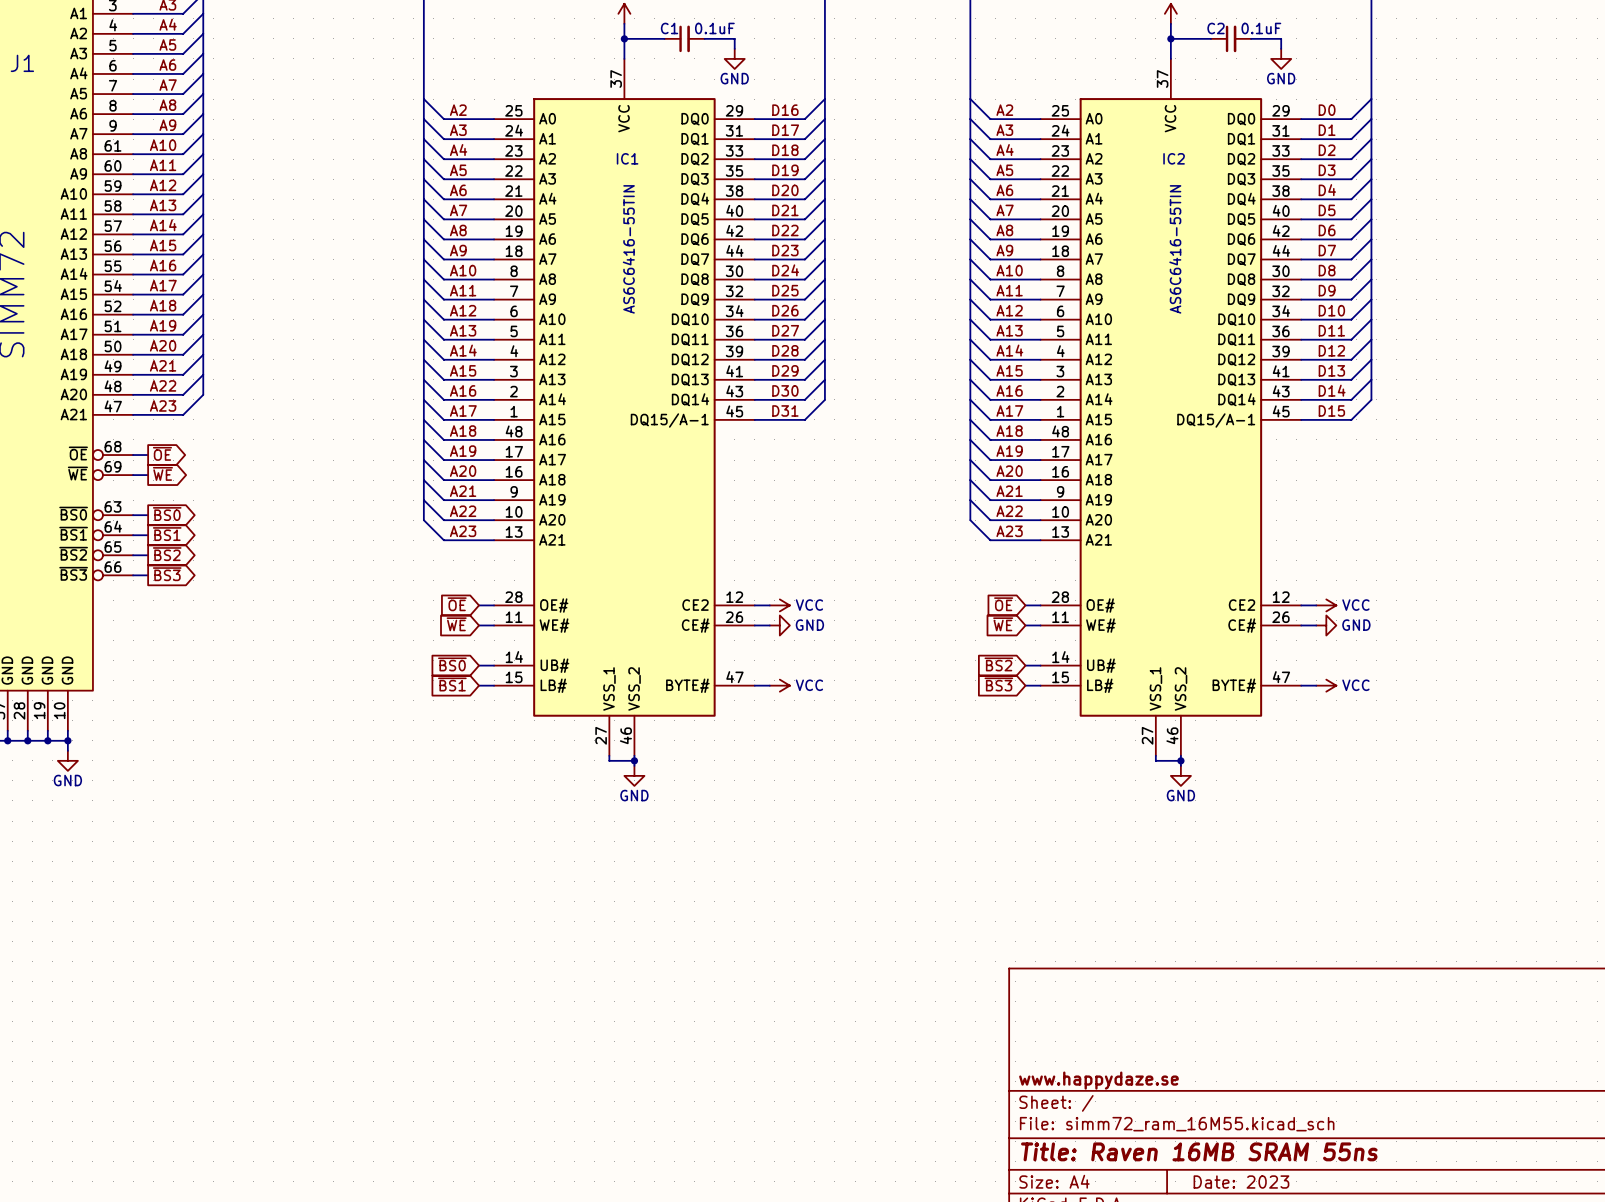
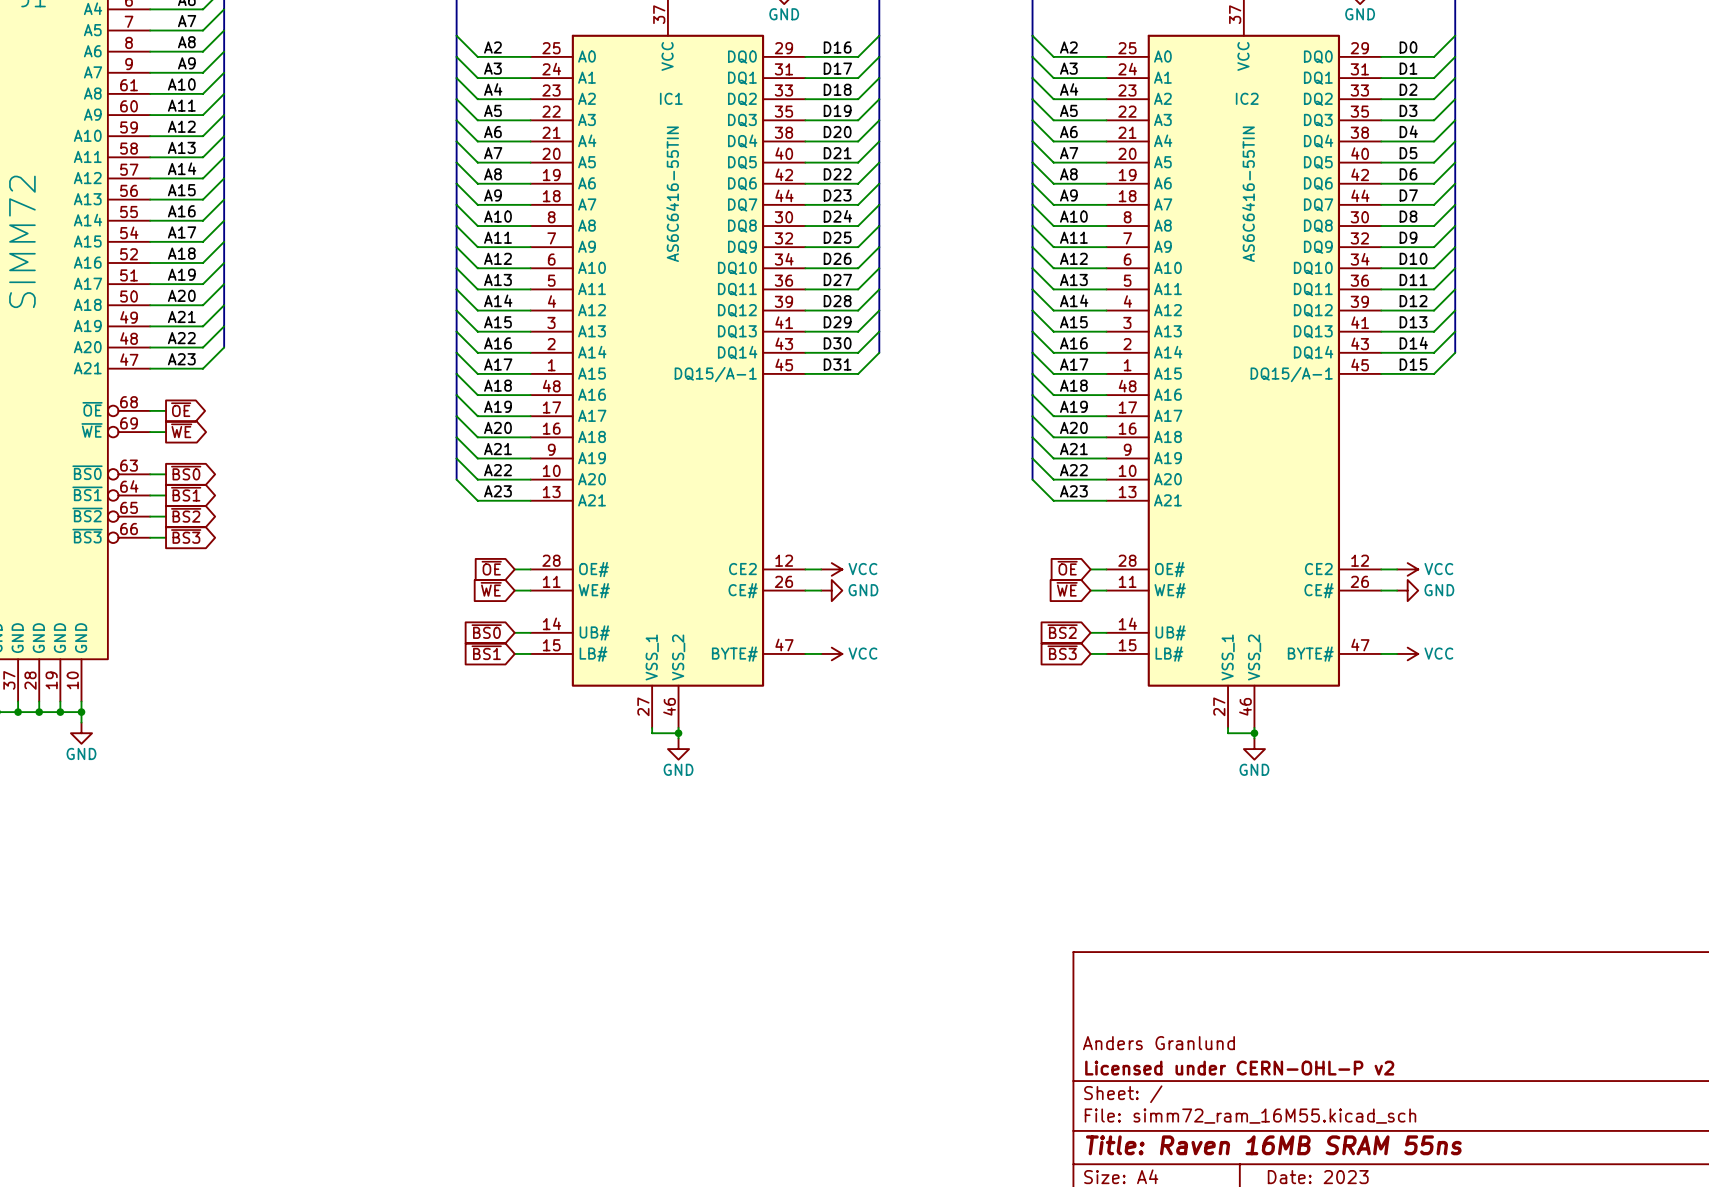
title block: none -> Anders Granlund (1158, 1043)
title block: www.happydaze.se (1098, 1080) -> Licensed under CERN-OHL-P v2 (1239, 1068)

